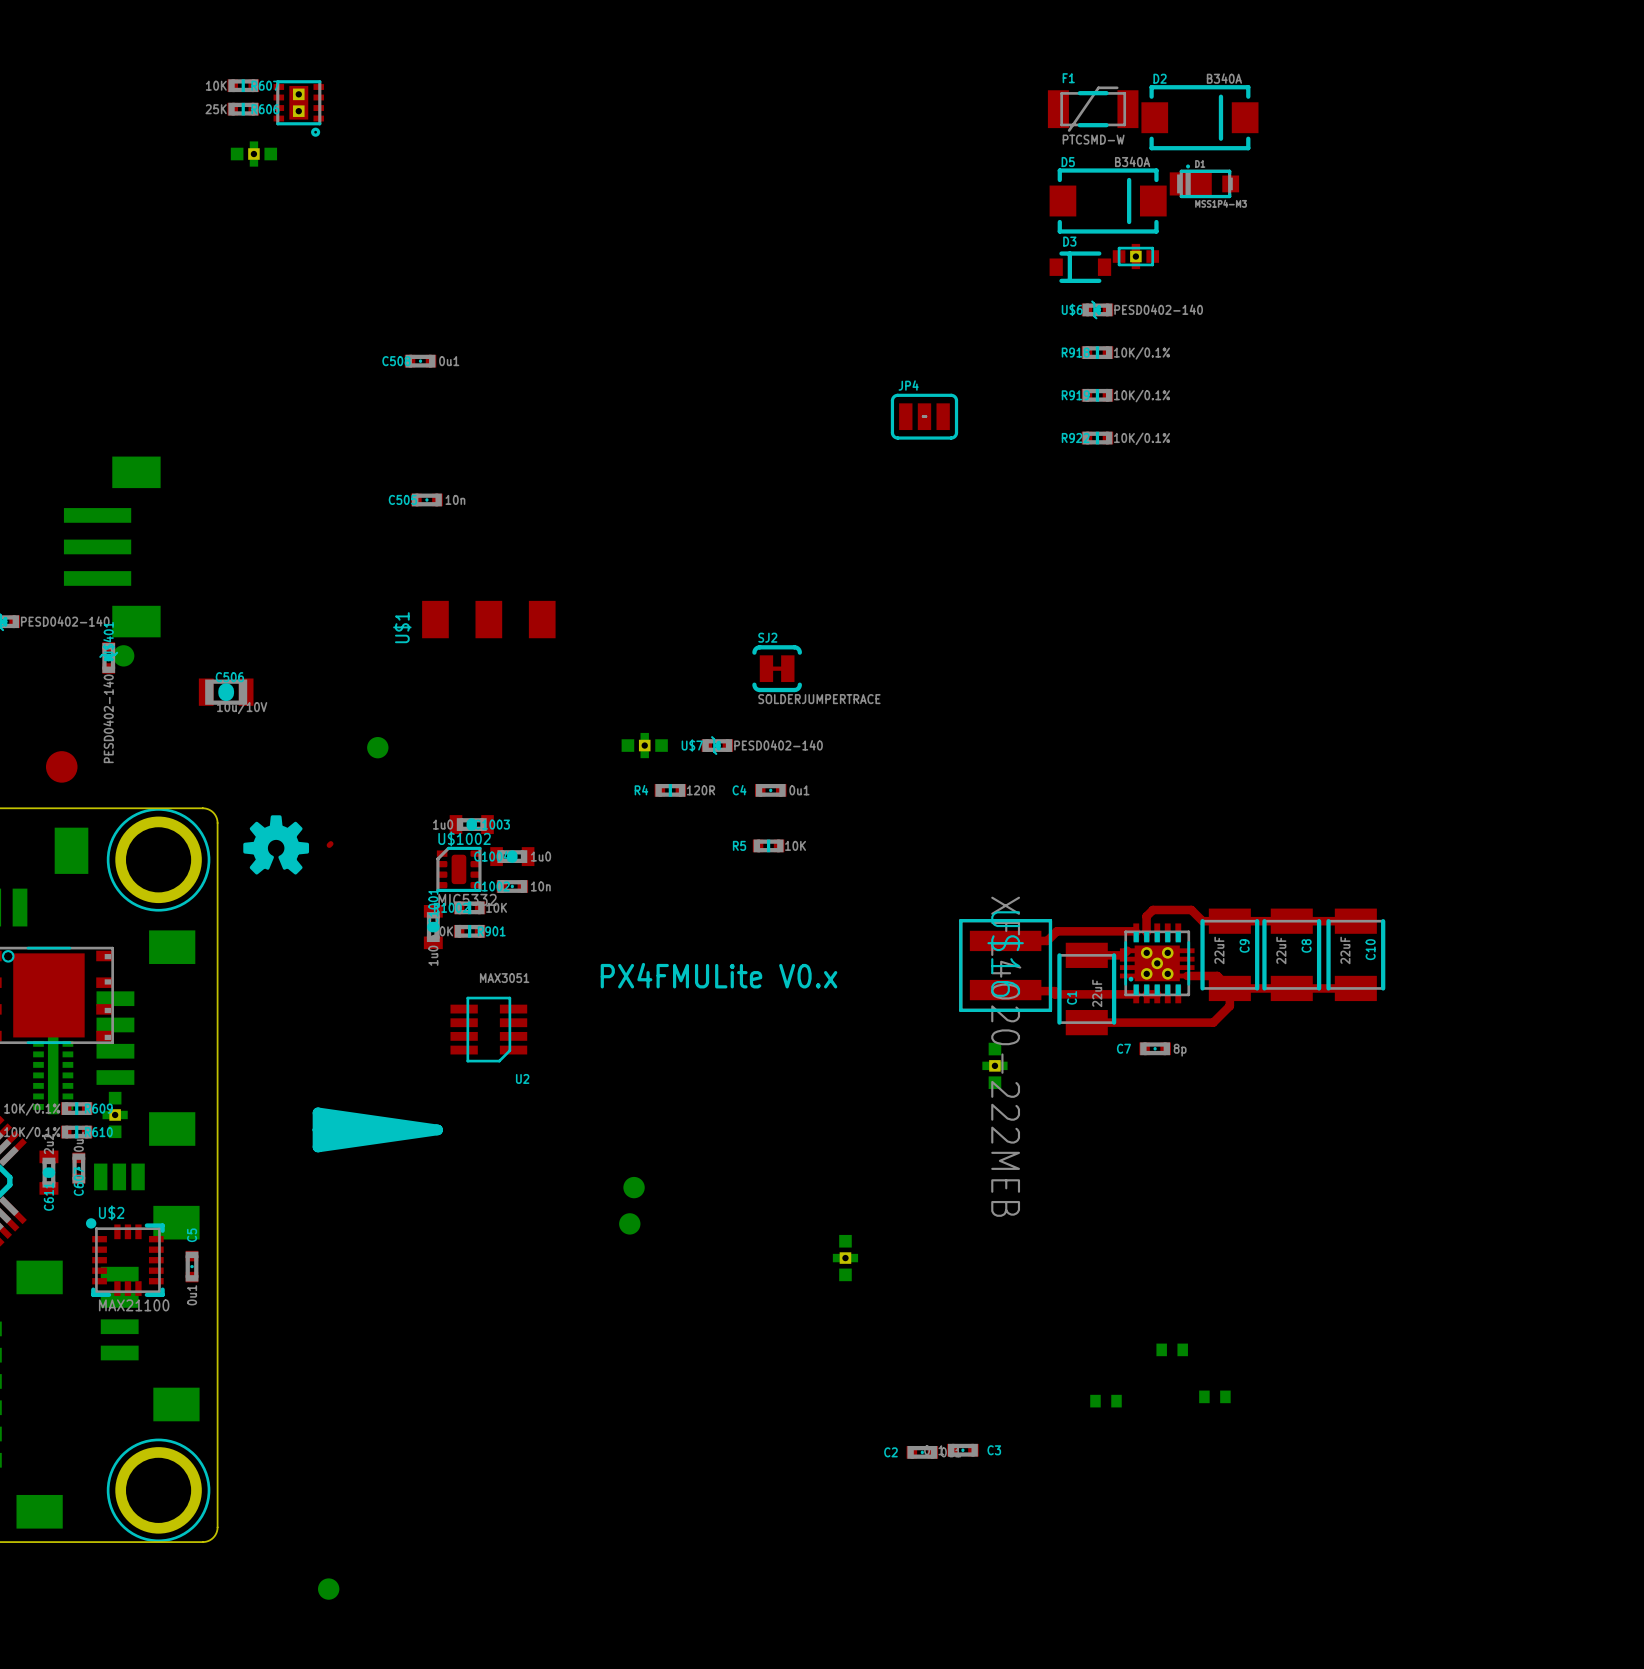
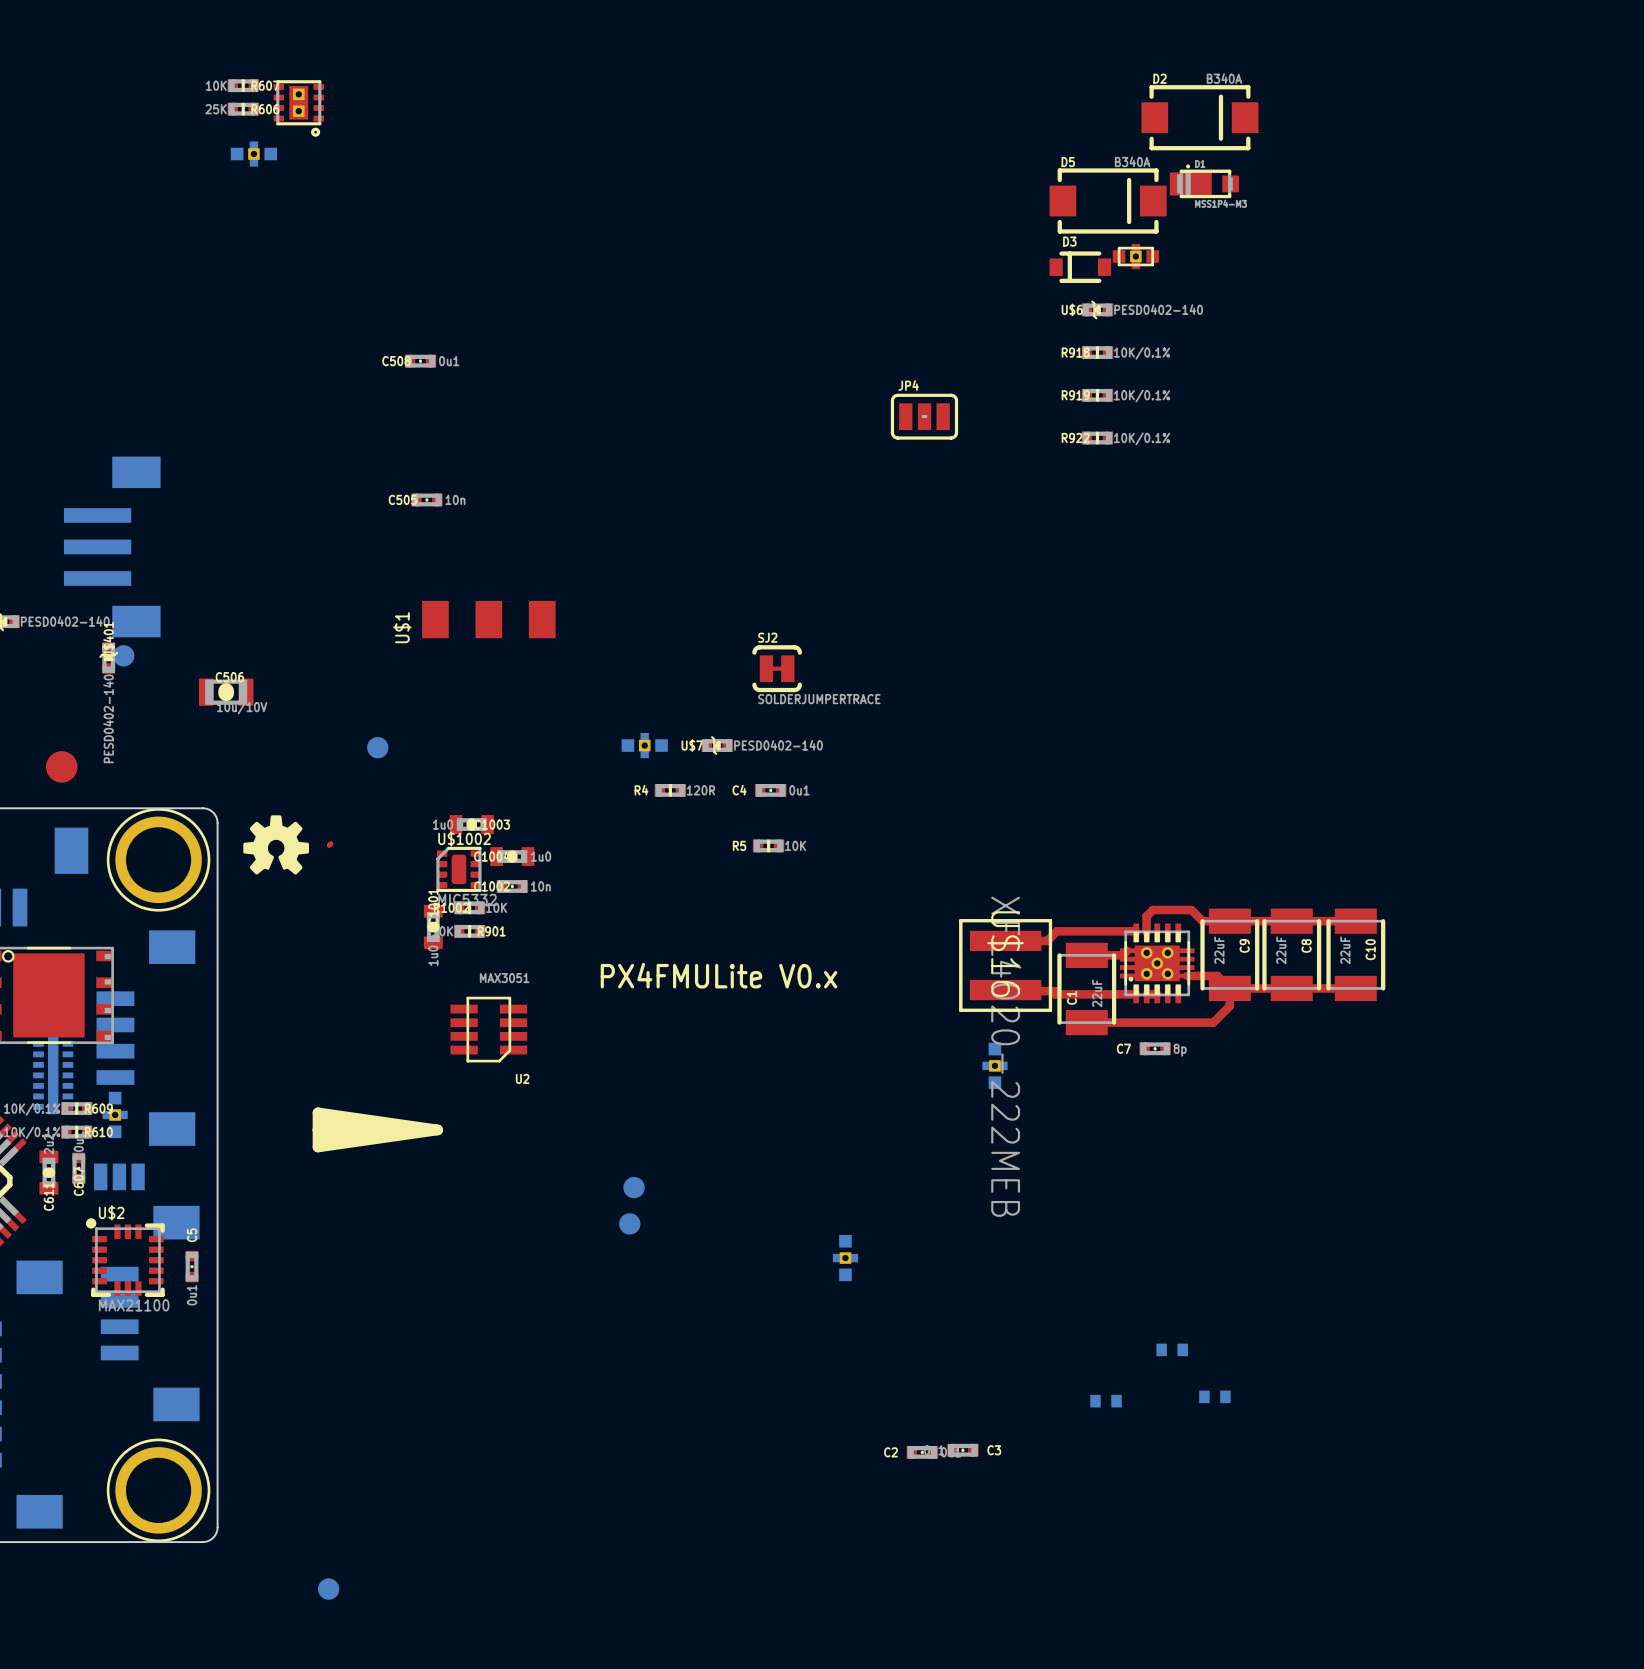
F1: PTCSMD-W (1093, 109) -> none

